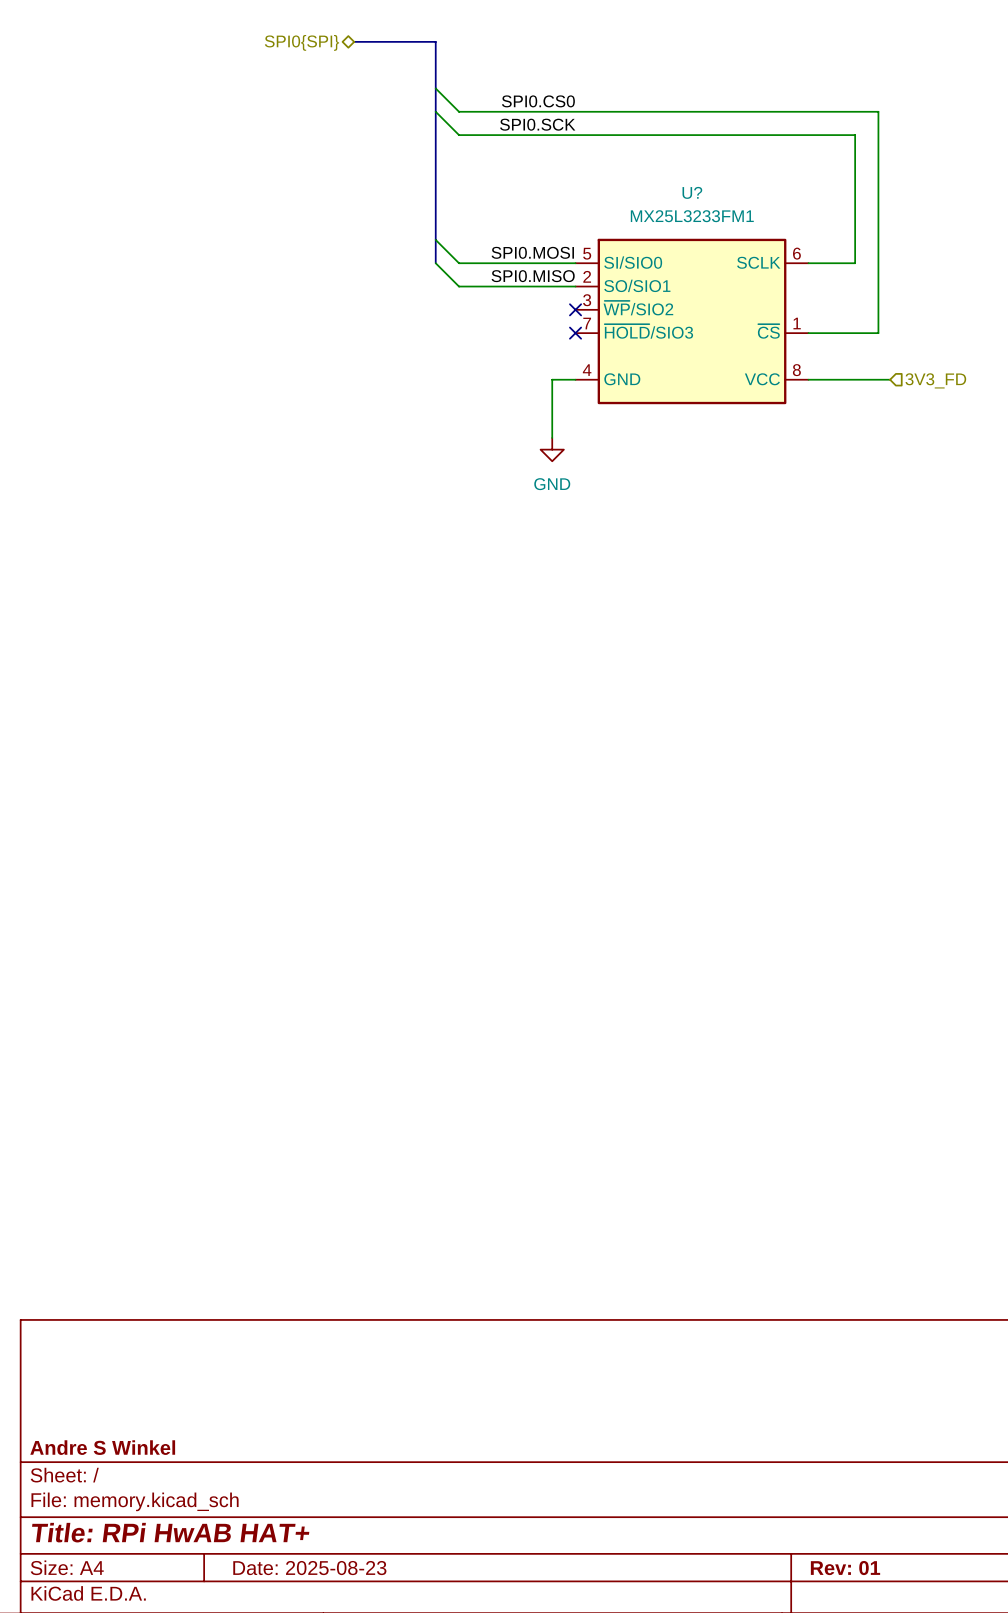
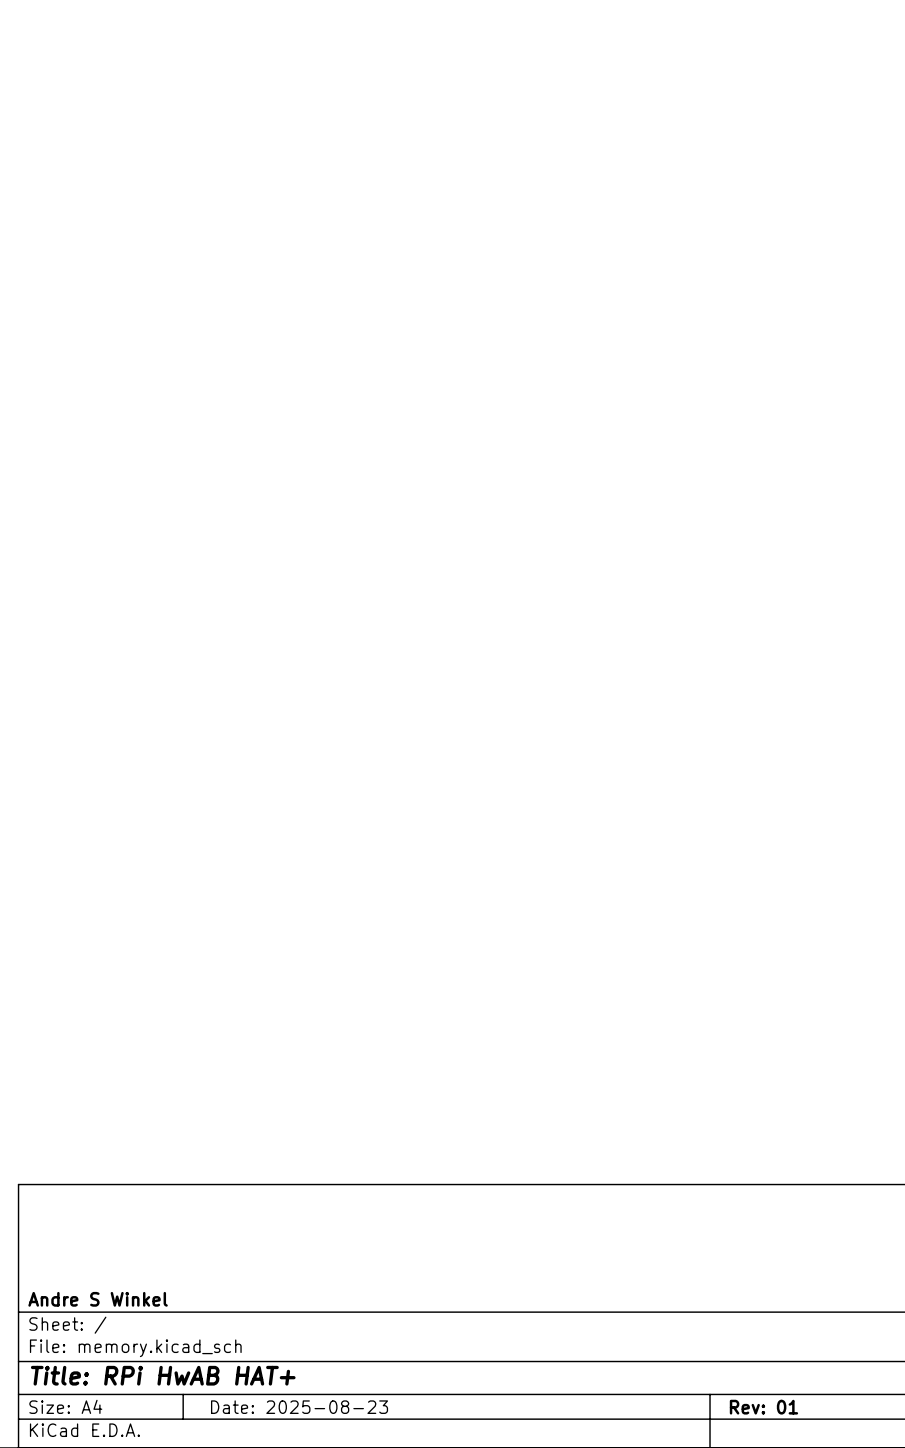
bus: (354, 41) (435, 41) (435, 263) -> none
hierarchical label: SPI0{SPI} (301, 42) -> none
wire: (435, 88) (459, 111) (878, 111) (878, 333) (808, 333) -> none
label: SPI0.CS0 (538, 101) -> none
wire: (435, 111) (459, 135) (855, 135) (855, 263) (808, 263) -> none
label: SPI0.SCK (537, 124) -> none
wire: (435, 239) (459, 263) (575, 263) -> none
label: SPI0.MOSI (532, 252) -> none
wire: (435, 263) (459, 286) (575, 286) -> none
label: SPI0.MISO (533, 276) -> none
no-connect mark: (575, 309) -> none
U?: MX25L3233FM1 (692, 321) -> none
no-connect mark: (575, 333) -> none
wire: (575, 379) (552, 379) (552, 437) -> none
wire: (808, 379) (890, 379) -> none
hierarchical label: 3V3_FD (935, 380) -> none
power symbol: GND (552, 449) -> none

